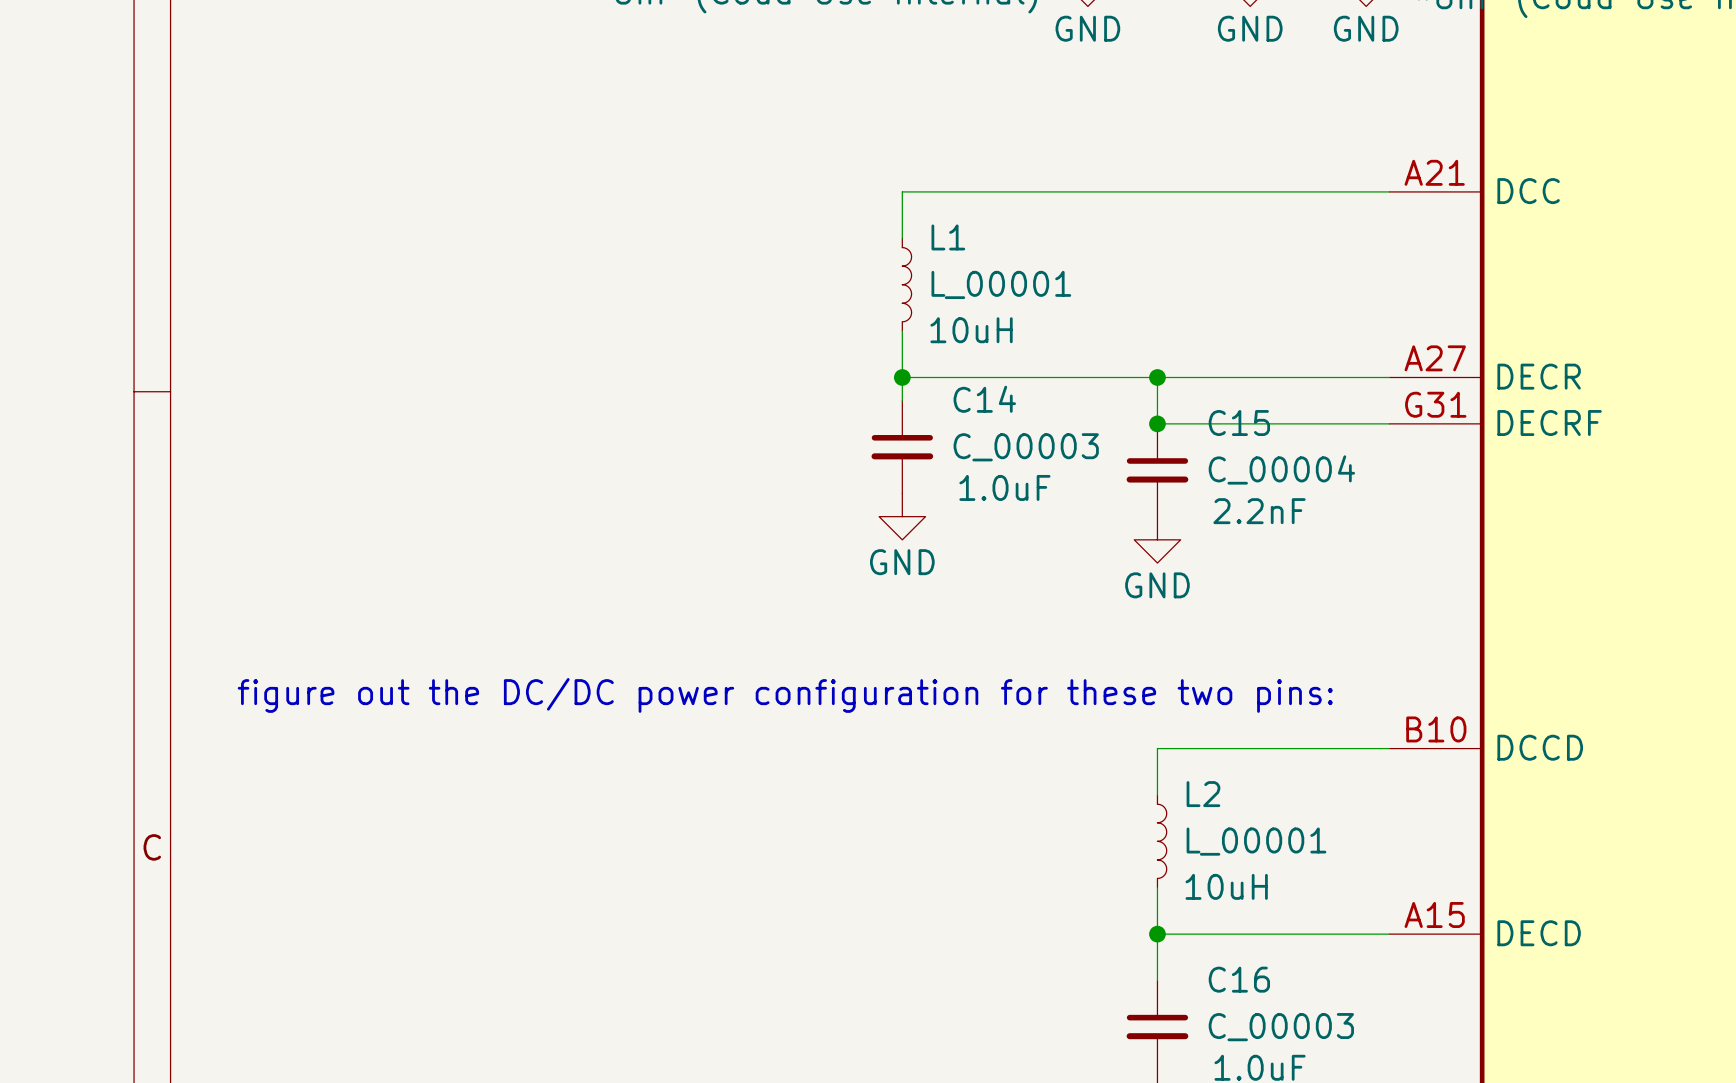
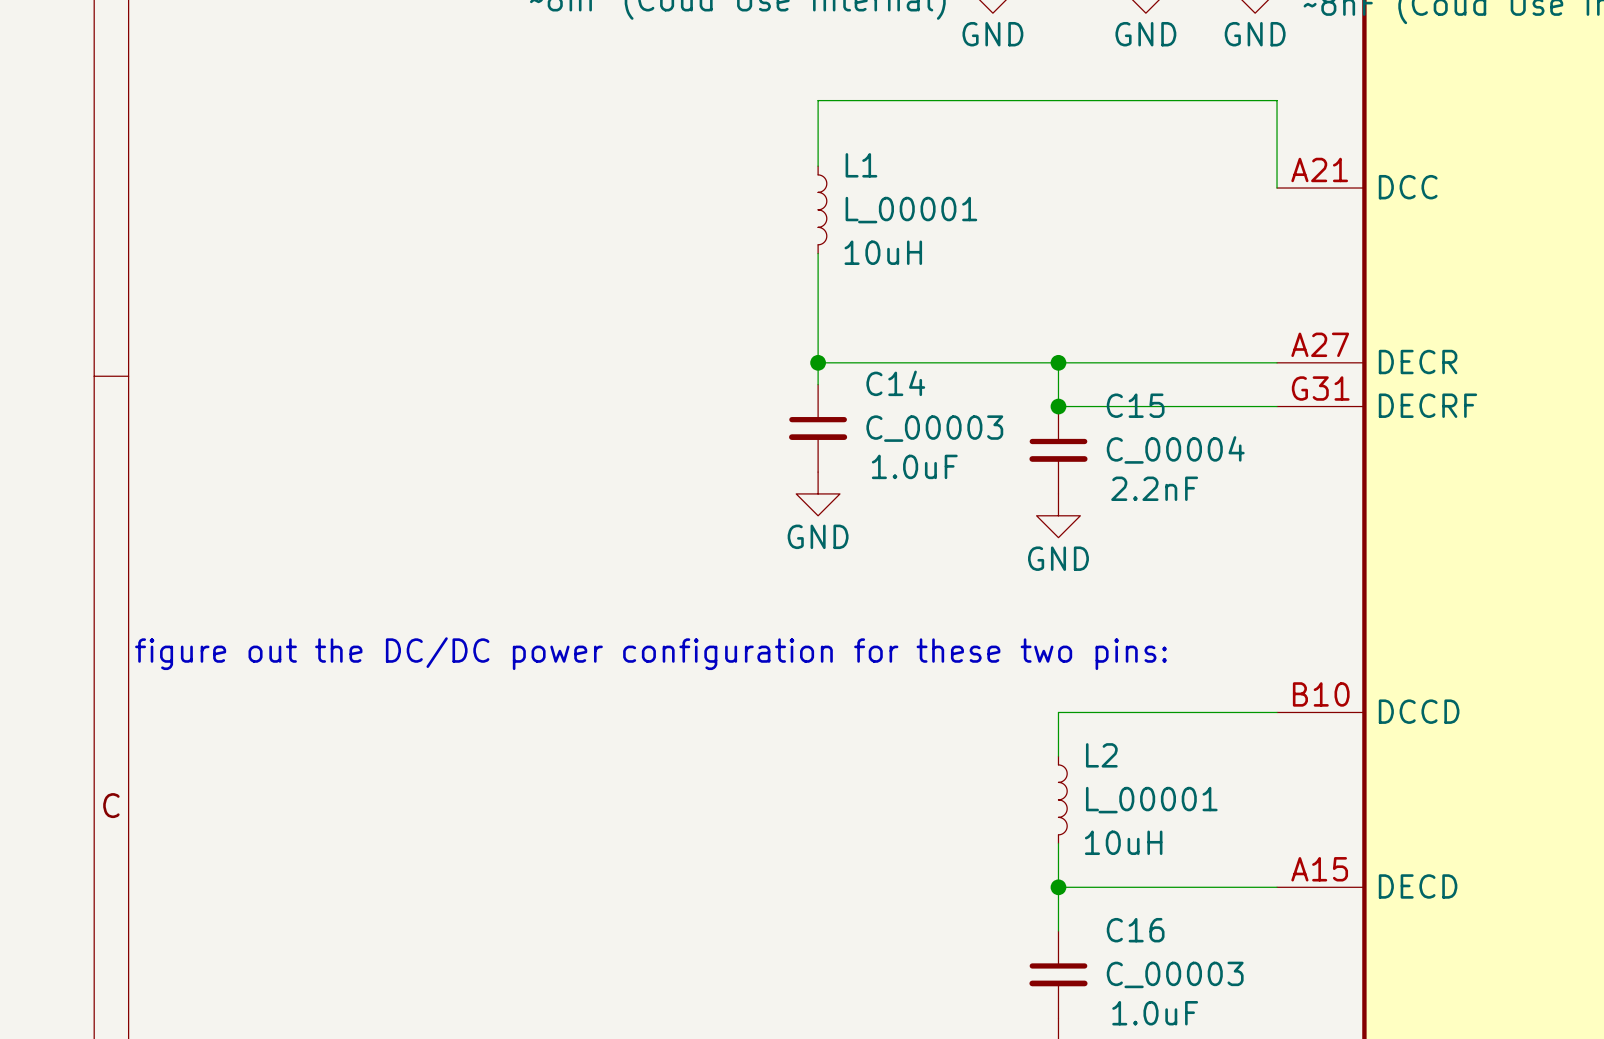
wire: (1389, 191) (902, 191) (902, 238) -> (1277, 188) (1277, 100) (818, 100) (818, 166)
wire: none -> (818, 253) (818, 319)
L1 position: (906, 284) -> (822, 209)
text position: figure out the DC/DC power configuration for these two pins: (785, 695) -> figure out the DC/DC power configuration for these two pins: (650, 653)

